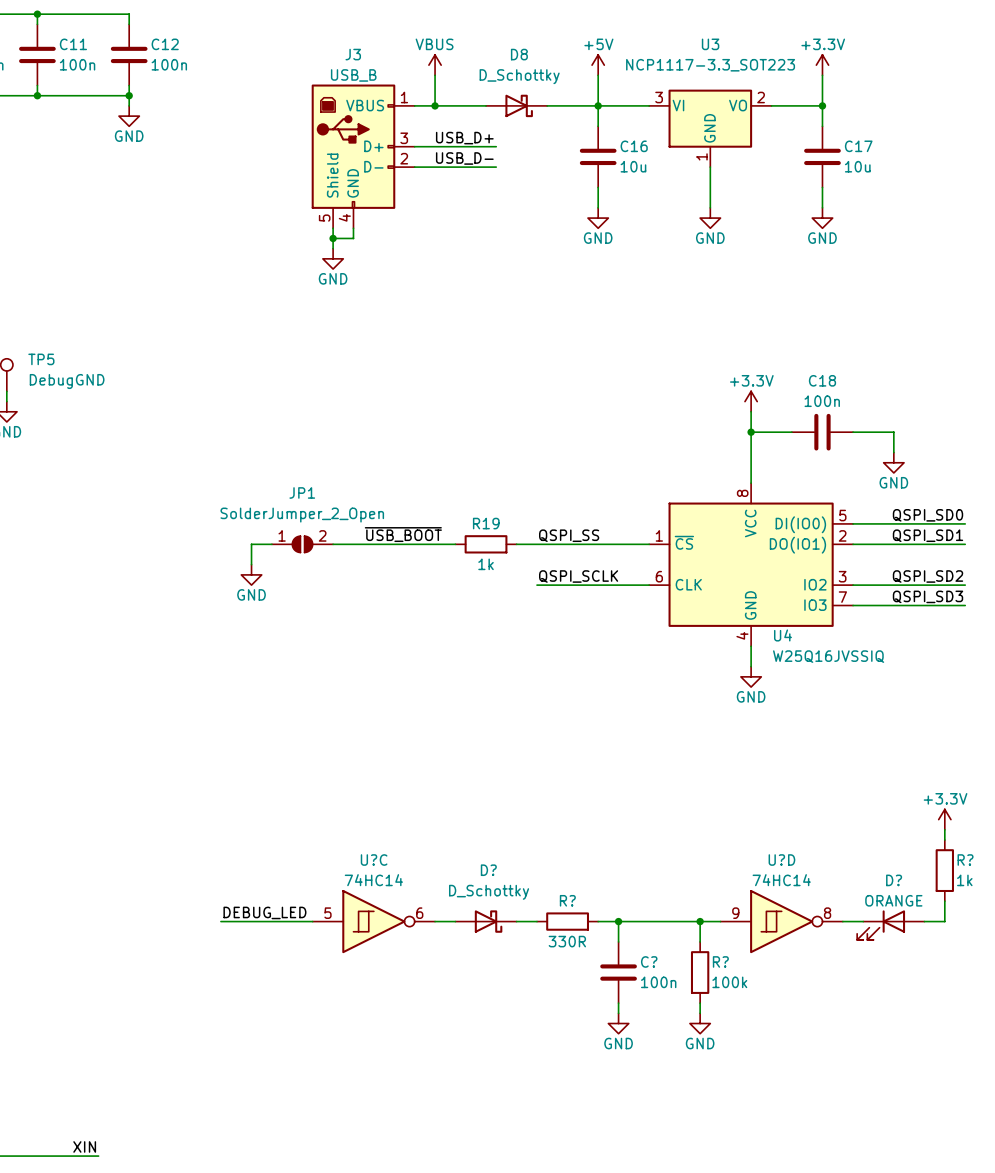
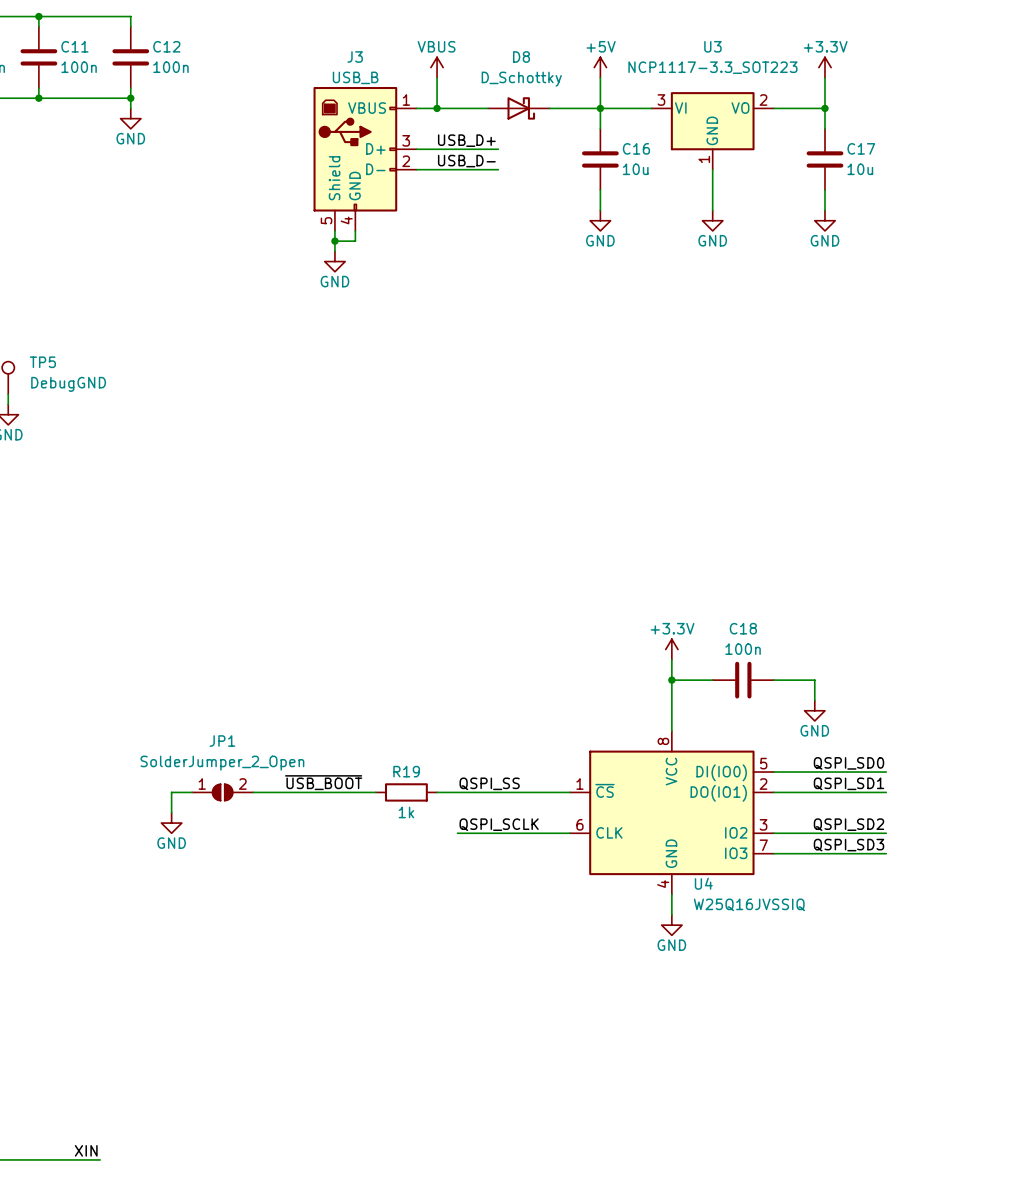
power symbol: +3.3V (751, 401) -> none
wire: (751, 411) (751, 483) -> none
wire: (751, 432) (791, 432) -> none
junction: (751, 432) -> none
C18 position: (822, 432) -> (743, 680)
wire: (853, 432) (893, 432) (893, 452) -> none
power symbol: GND (893, 462) -> none
label: QSPI_SD0 (927, 515) -> none
wire: (853, 523) (965, 523) -> none
label: ~{USB_BOOT} (403, 534) -> none
label: QSPI_SS (569, 535) -> none
label: QSPI_SD1 (927, 535) -> none
wire: (271, 544) (251, 544) (251, 564) -> none
JP1 position: (302, 544) -> (222, 792)
wire: (333, 544) (455, 544) -> none
R19 position: (486, 544) -> (406, 792)
wire: (516, 544) (649, 544) -> none
wire: (853, 544) (965, 544) -> none
U4 position: (751, 564) -> (671, 812)
power symbol: GND (251, 574) -> none
label: QSPI_SCLK (578, 576) -> none
label: QSPI_SD2 (927, 576) -> none
wire: (537, 585) (649, 585) -> none
wire: (853, 585) (965, 585) -> none
label: QSPI_SD3 (927, 596) -> none
wire: (853, 605) (965, 605) -> (773, 772) (886, 772)
power symbol: none -> +3.3V (671, 649)
wire: (751, 646) (751, 666) -> none
wire: none -> (671, 659) (671, 731)
wire: none -> (671, 680) (712, 680)
junction: none -> (671, 680)
power symbol position: GND (751, 676) -> GND (814, 710)
wire: none -> (773, 680) (814, 680) (814, 700)
label: none -> QSPI_SD0 (848, 763)
label: none -> ~{USB_BOOT} (323, 782)
label: none -> QSPI_SS (489, 783)
label: none -> QSPI_SD1 (848, 783)
wire: none -> (192, 792) (171, 792) (171, 812)
wire: none -> (253, 792) (375, 792)
wire: none -> (437, 792) (569, 792)
wire: none -> (773, 792) (886, 792)
power symbol: none -> GND (171, 823)
power symbol: +3.3V (944, 819) -> none
label: none -> QSPI_SCLK (499, 824)
label: none -> QSPI_SD2 (848, 824)
wire: none -> (457, 833) (569, 833)
wire: none -> (773, 833) (886, 833)
wire: (944, 829) (944, 840) -> none
label: none -> QSPI_SD3 (848, 845)
wire: none -> (773, 853) (886, 853)
R?: 1k (944, 870) -> none
wire: (944, 901) (944, 921) (924, 921) -> none
label: DEBUG_LED (264, 912) -> none
wire: (220, 921) (312, 921) -> none
U?C: 74HC14 (373, 921) -> none
wire: (435, 921) (455, 921) -> none
D?: D_Schottky (486, 921) -> none
wire: (516, 921) (537, 921) -> none
R?: 330R (567, 921) -> none
wire: (598, 921) (720, 921) -> none
wire: (618, 921) (618, 941) -> none
junction: (618, 921) -> none
power symbol: none -> GND (671, 925)
wire: (700, 921) (700, 941) -> (671, 894) (671, 914)
junction: (700, 921) -> none
U?D: 74HC14 (781, 921) -> none
wire: (842, 921) (863, 921) -> none
D?: ORANGE (890, 925) -> none
C?: 100n (618, 972) -> none
R?: 100k (700, 972) -> none
wire: (618, 1003) (618, 1013) -> none
wire: (700, 1003) (700, 1013) -> none
power symbol: GND (618, 1023) -> none
power symbol: GND (700, 1023) -> none

